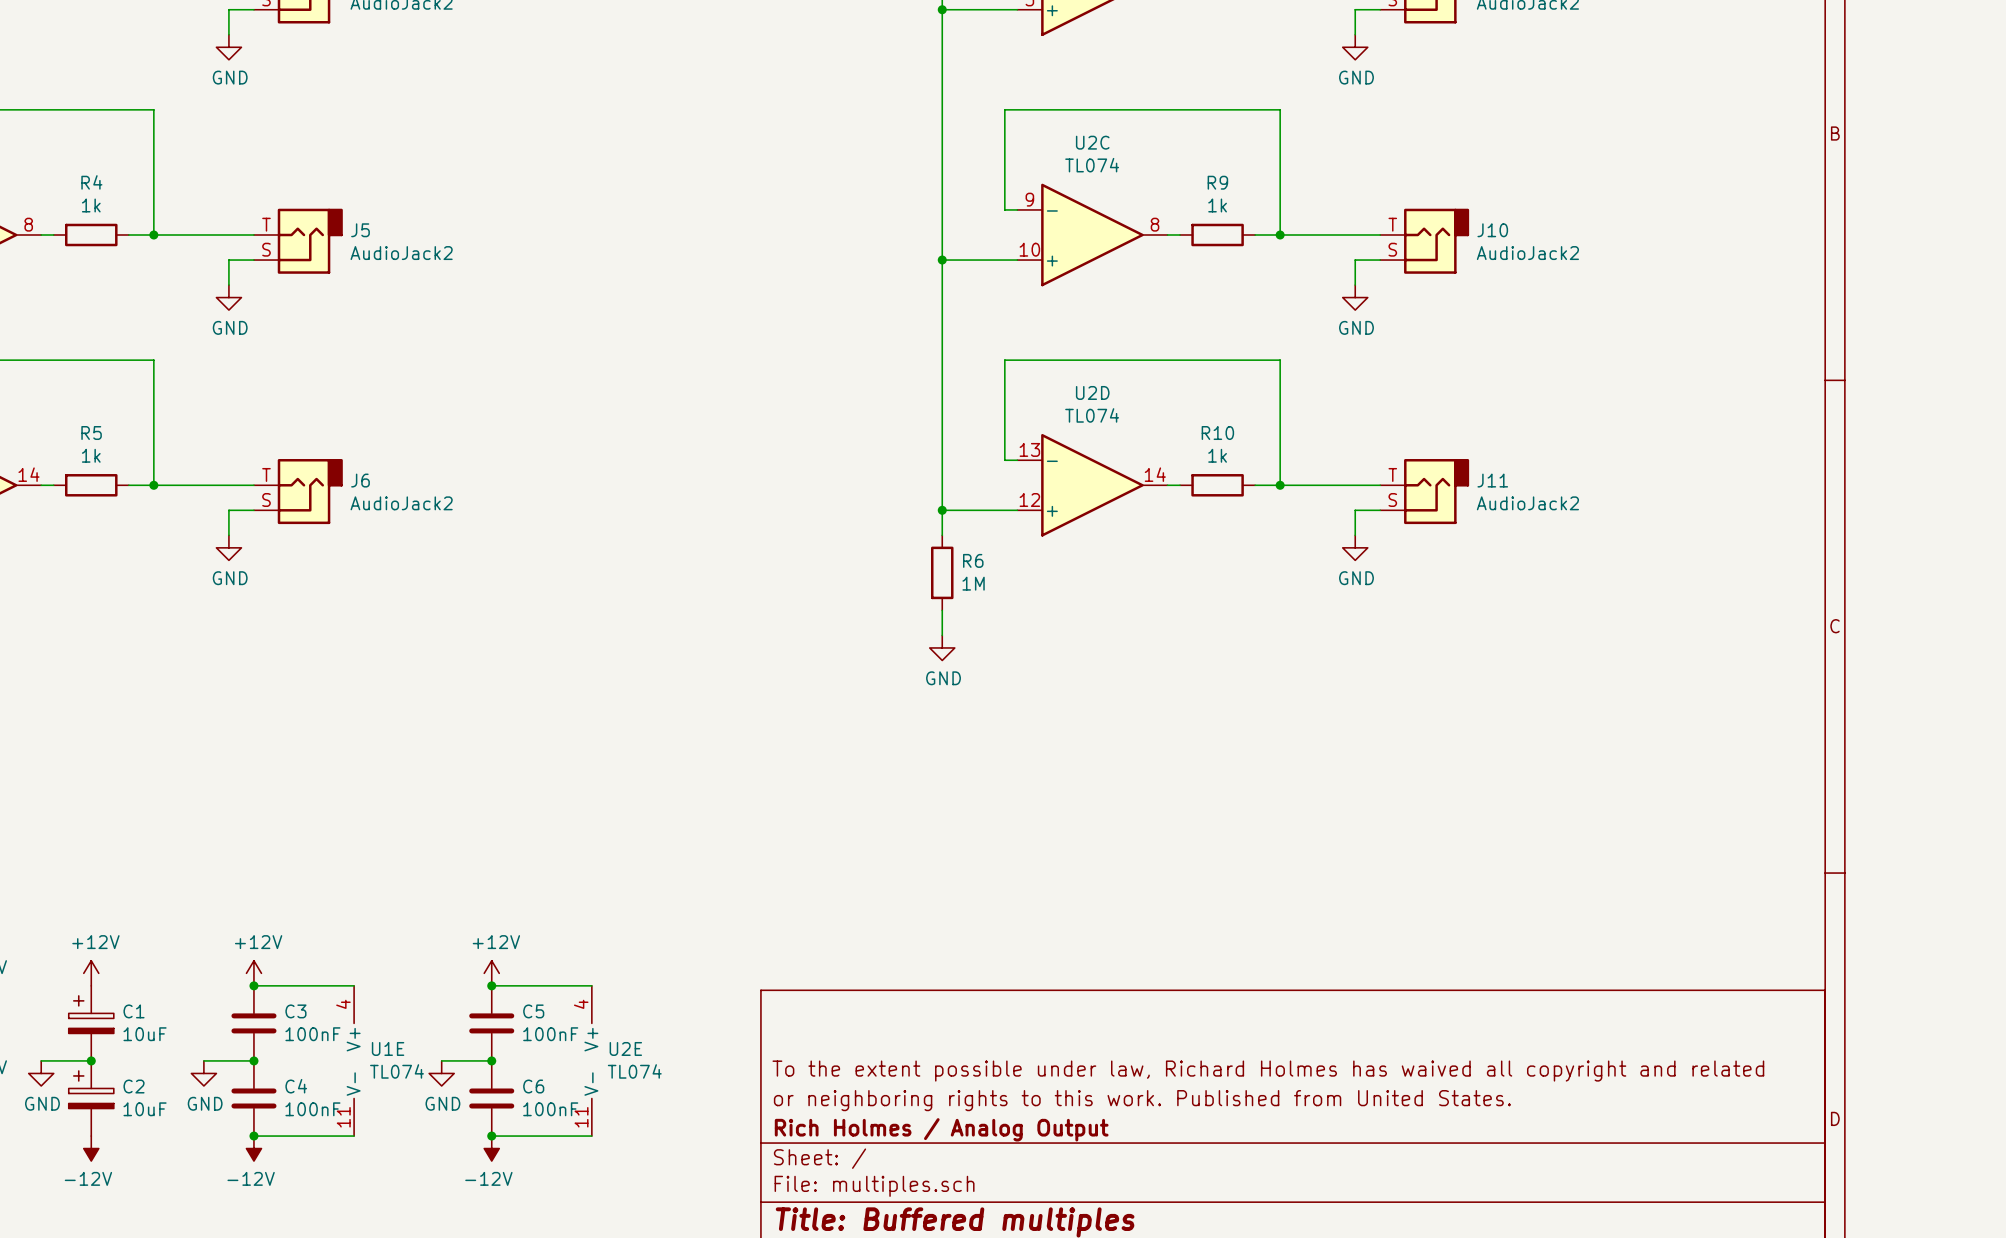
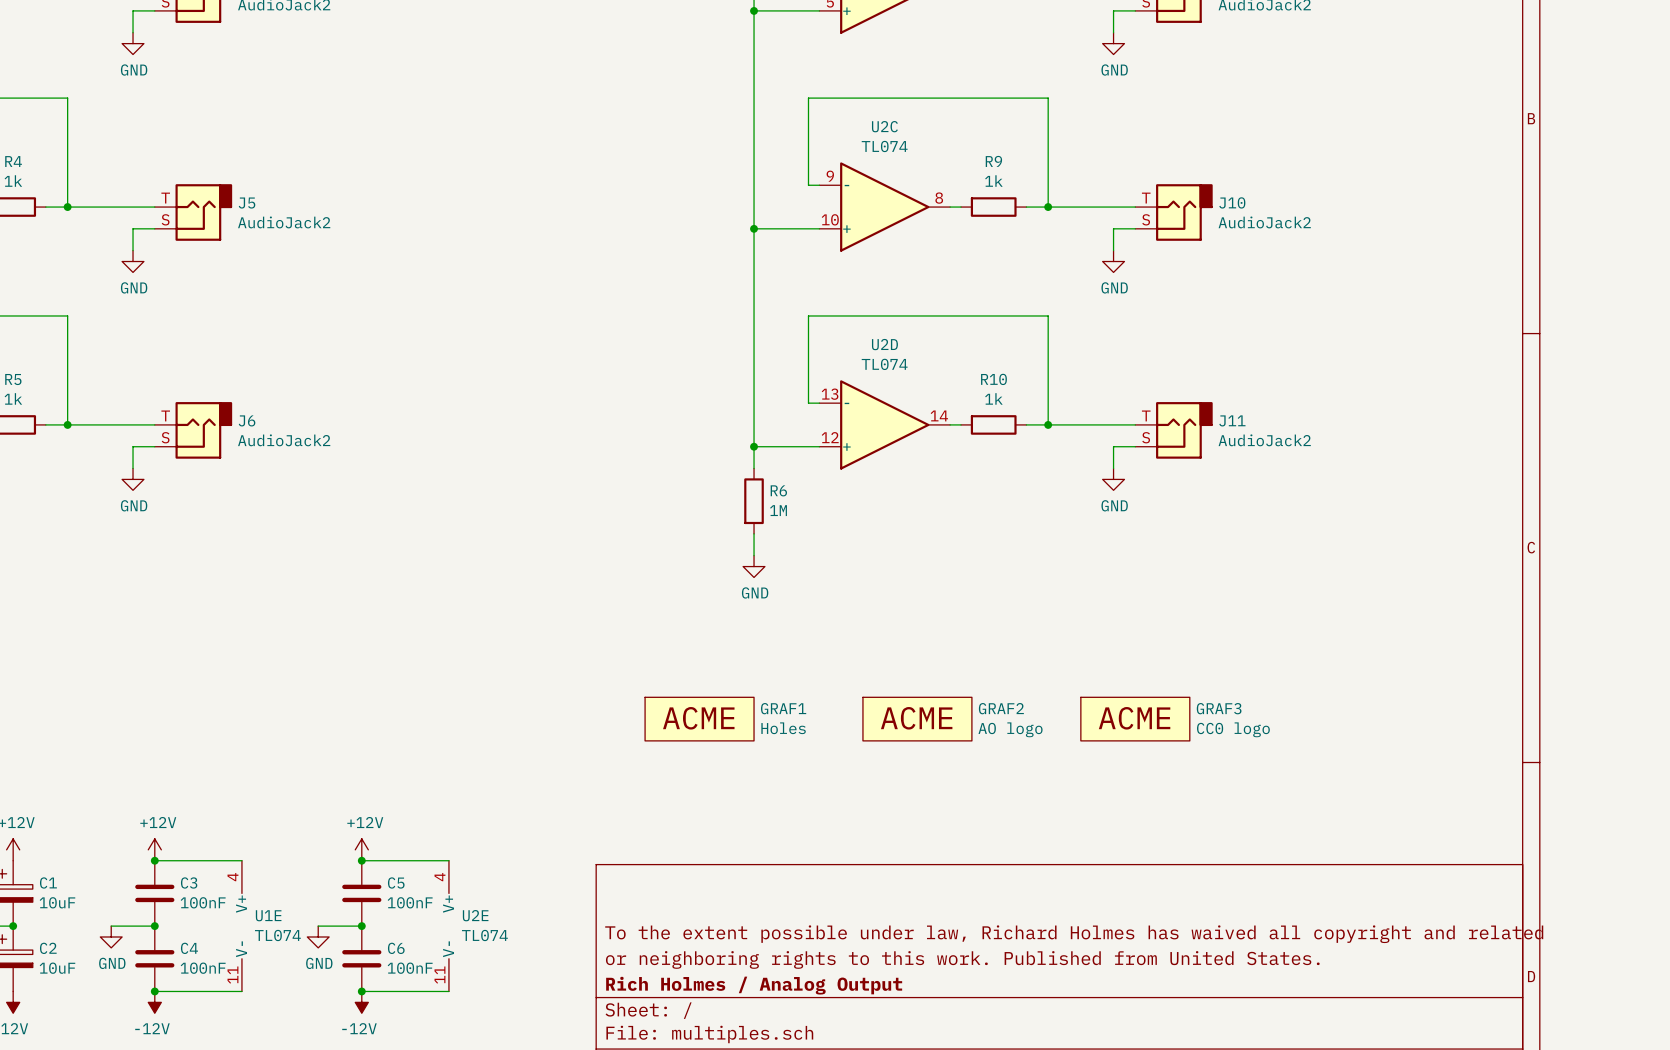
GRAF1: none -> Holes (699, 719)
GRAF2: none -> AO logo (917, 719)
GRAF3: none -> CC0 logo (1135, 719)

